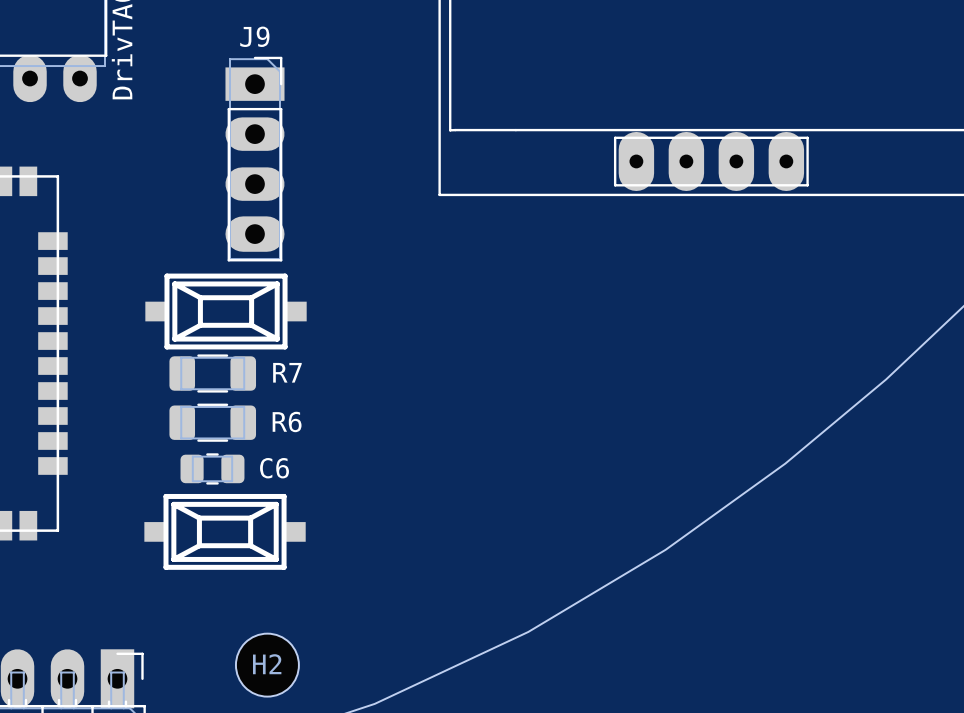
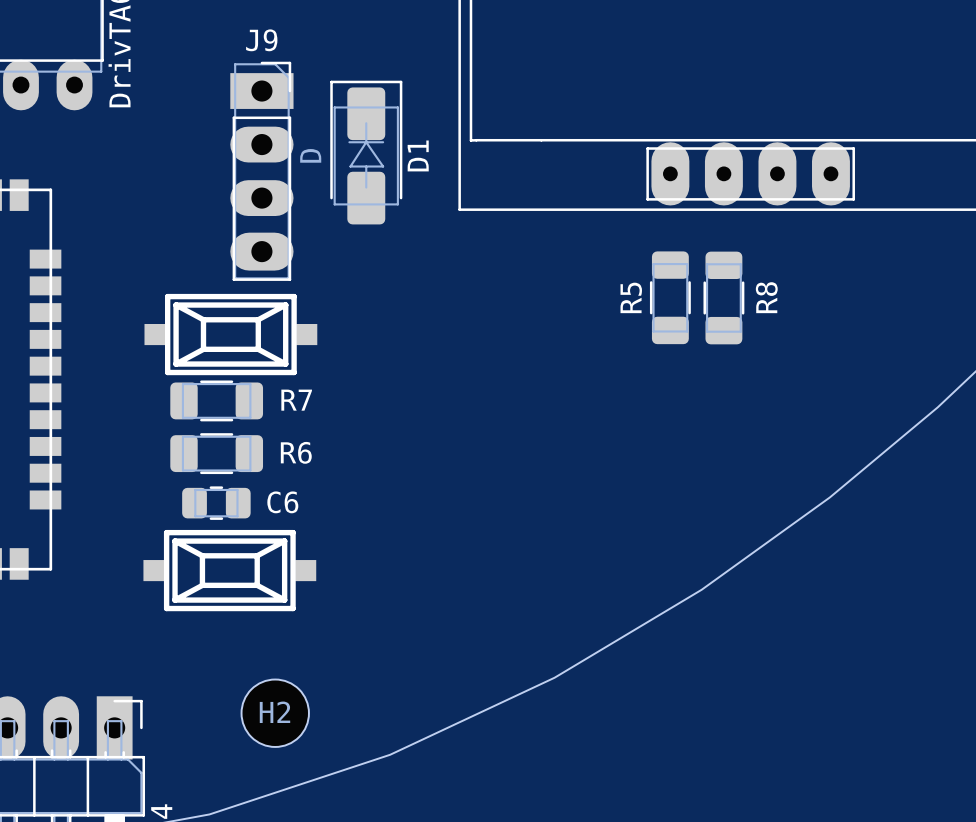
D1: none -> D (366, 152)
R5: none -> (670, 297)
R8: none -> (723, 297)

